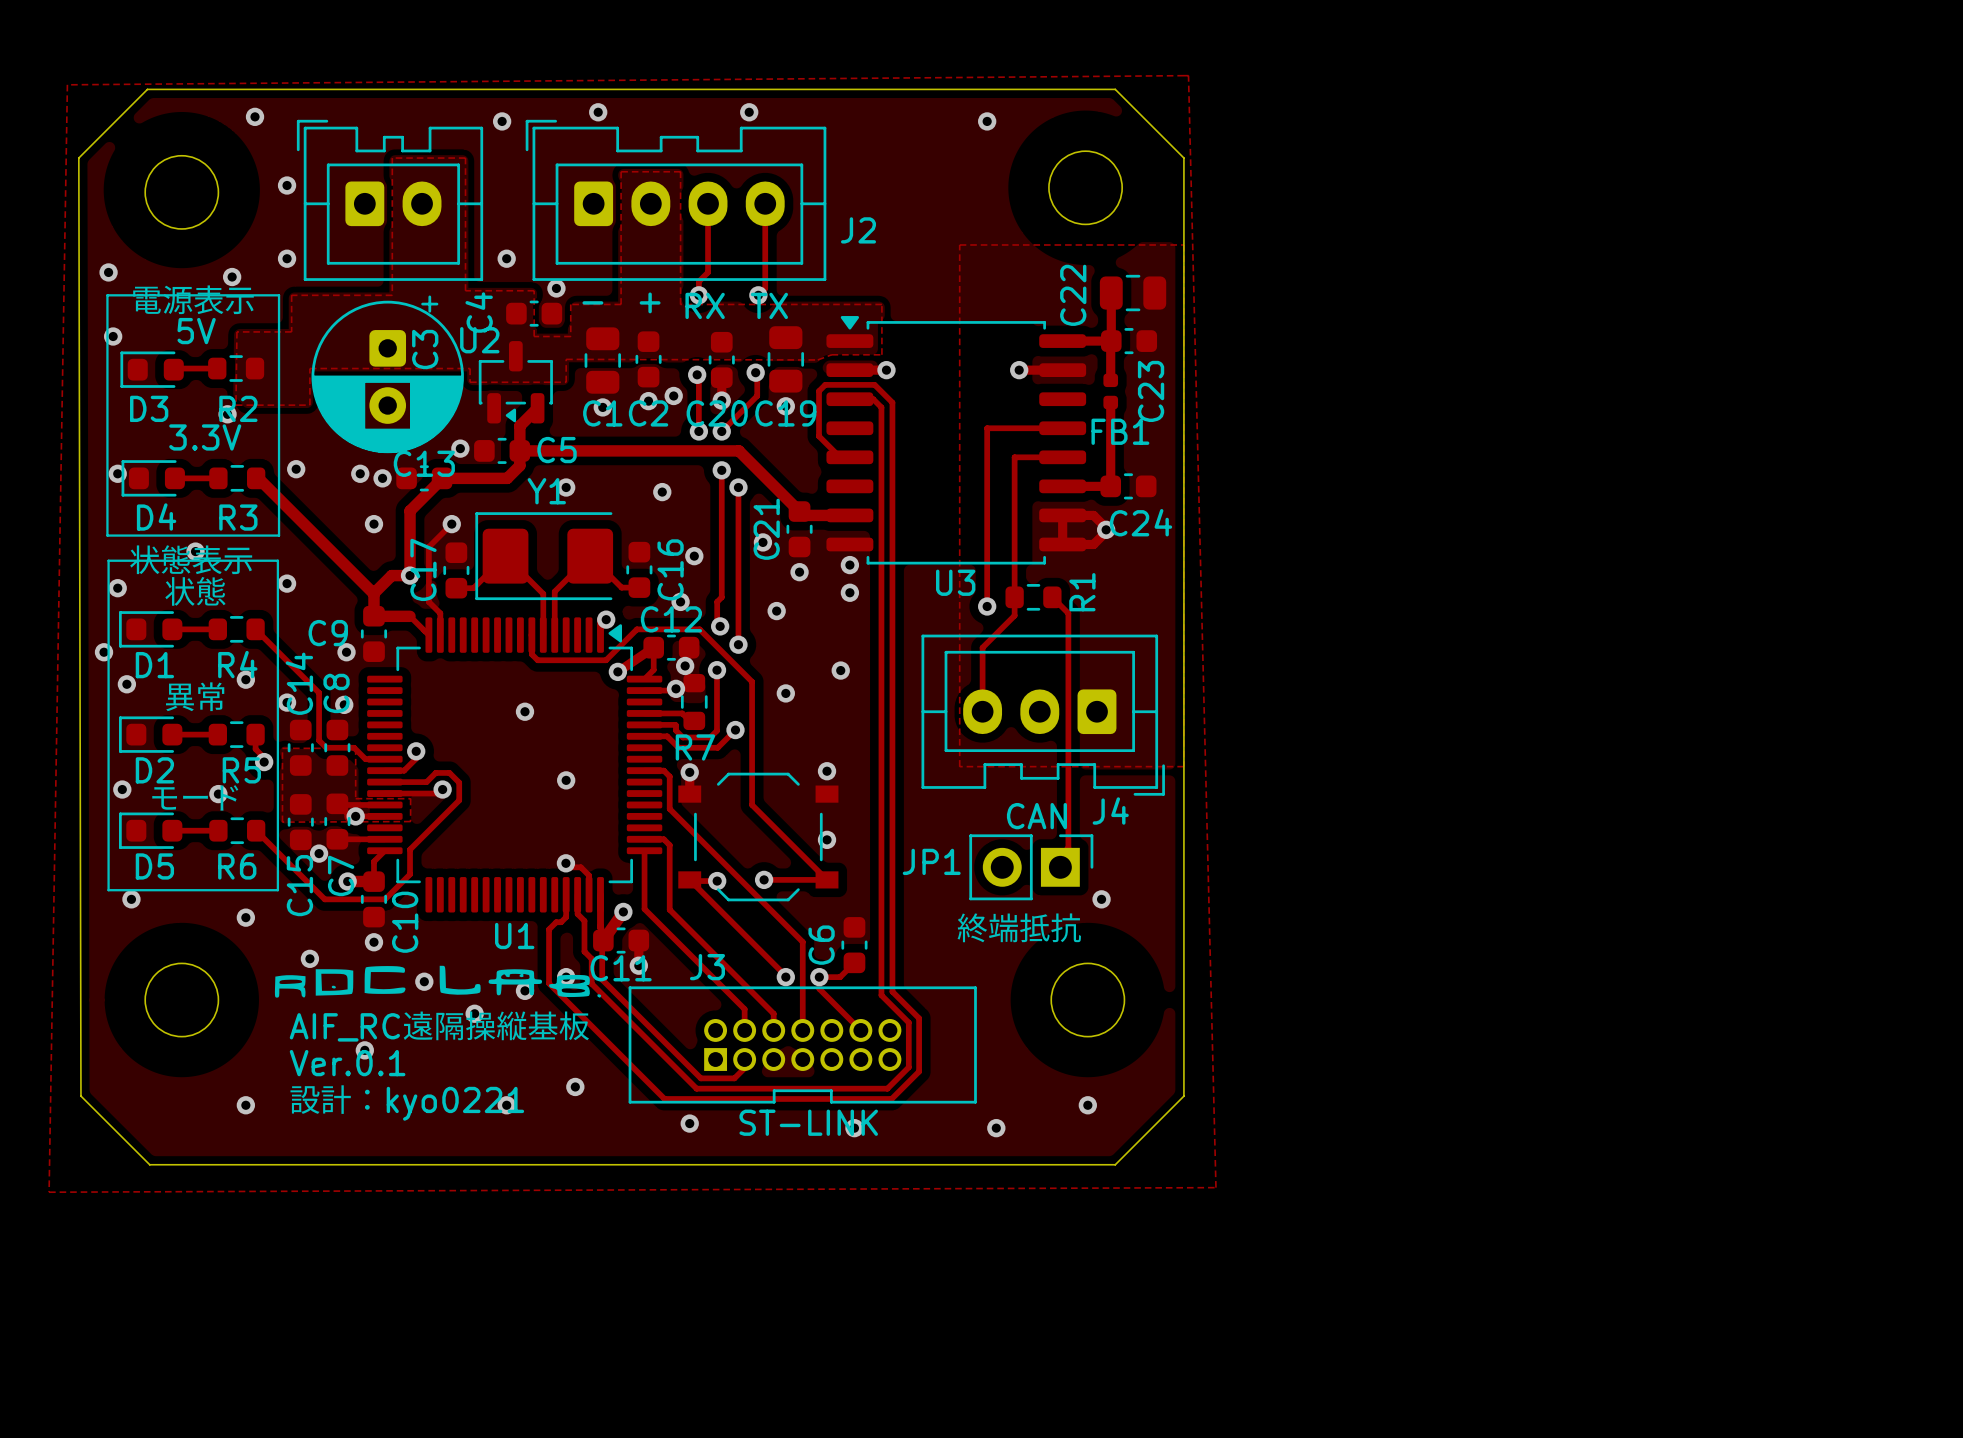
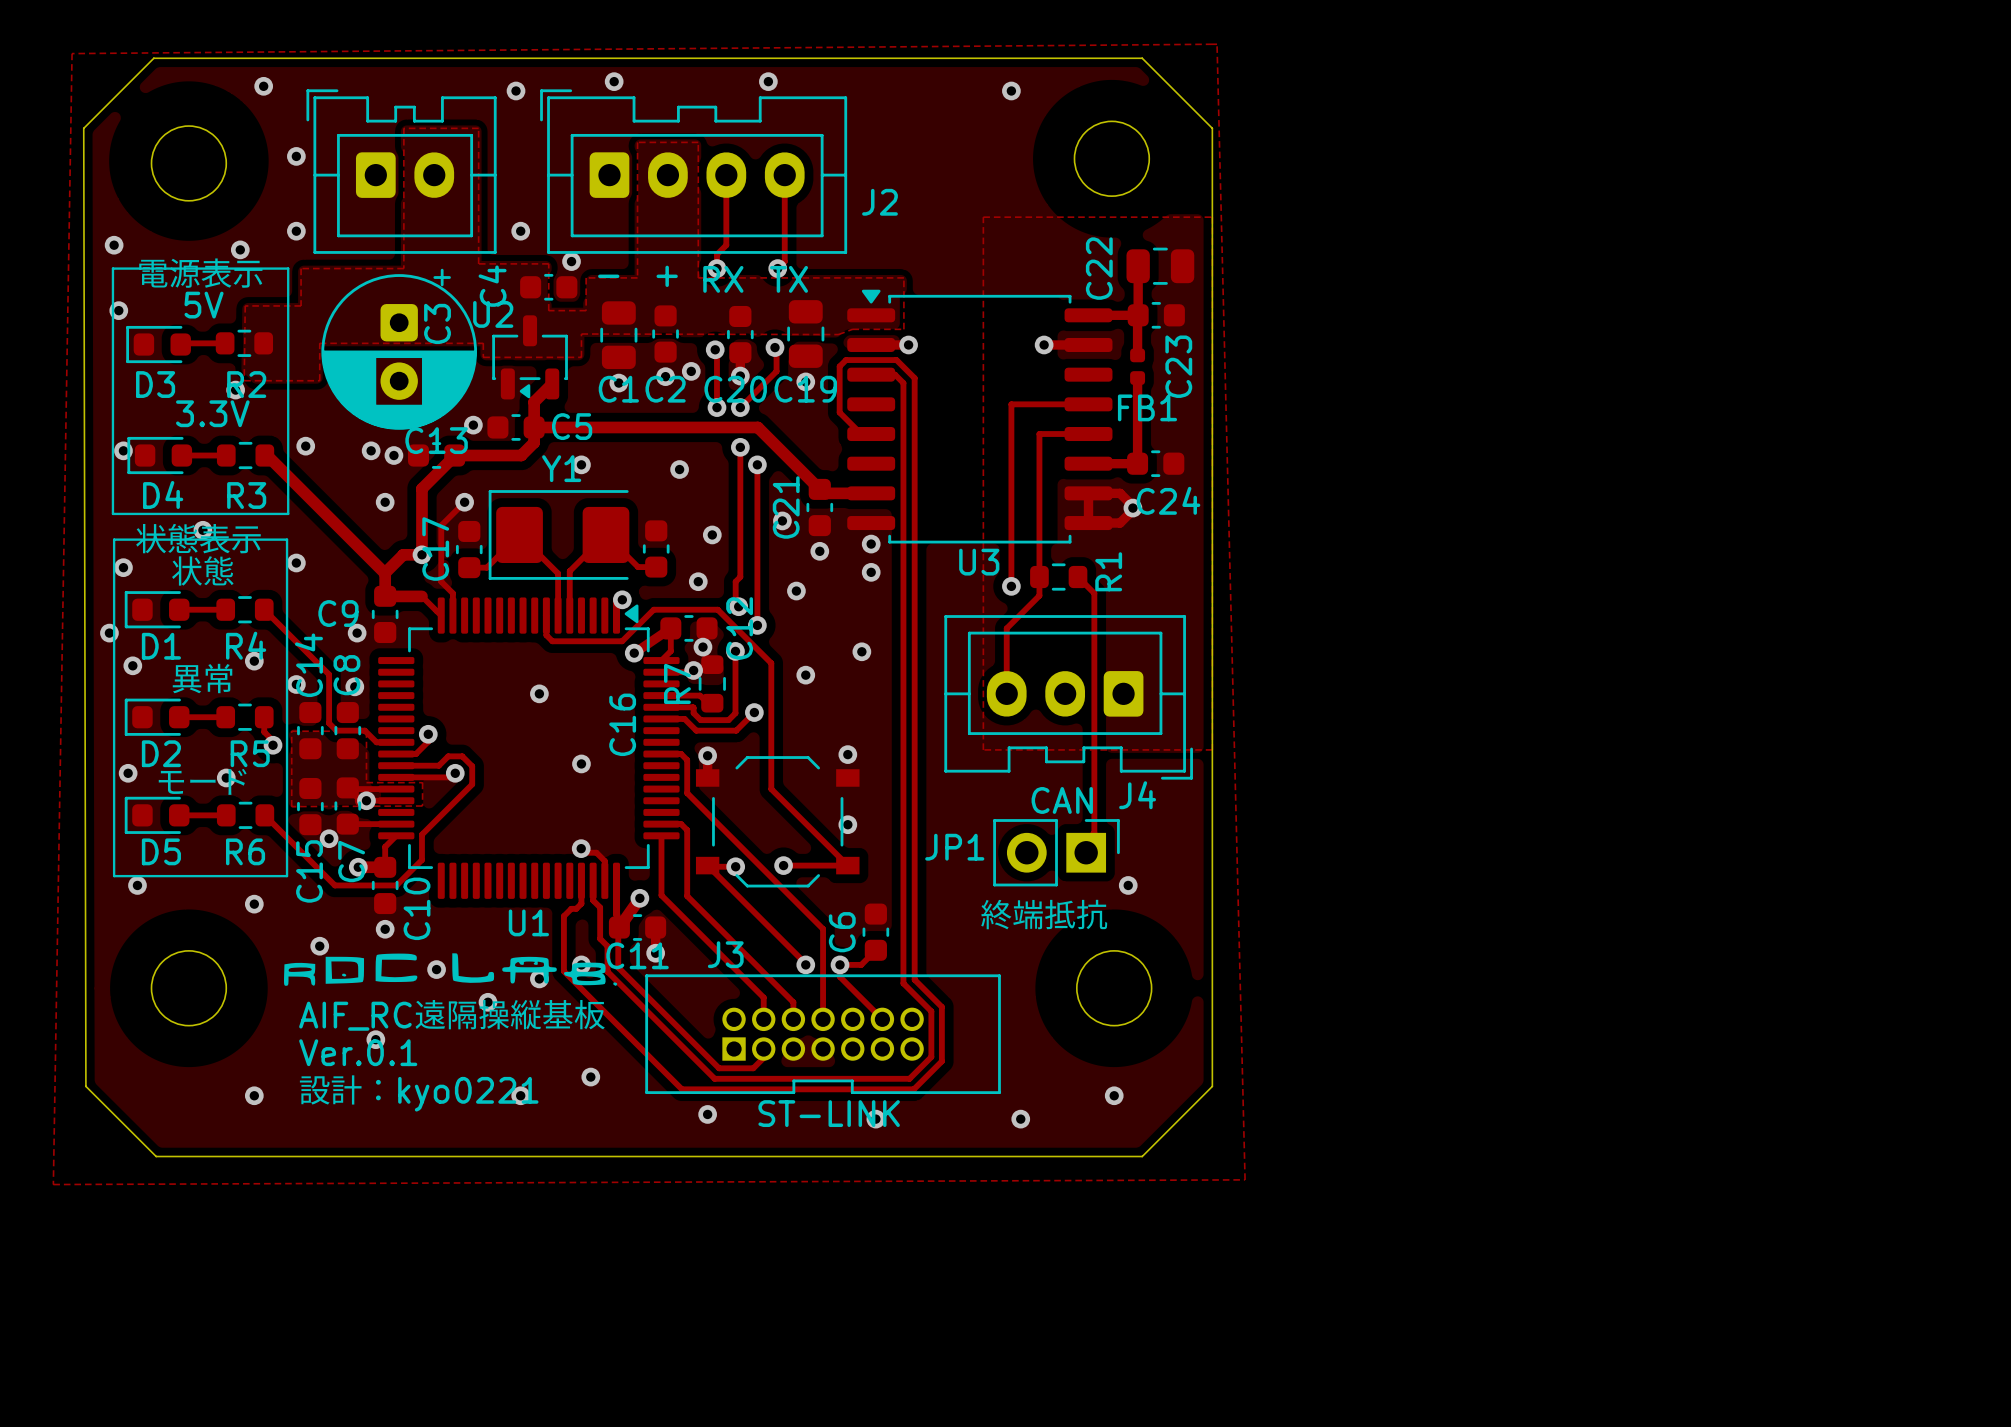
C16 name position: C16 (670, 569) -> C16 (622, 724)
C12 name rotation: 0° (671, 619) -> 90° counterclockwise (739, 628)
R7 name rotation: 0° (695, 747) -> 90° counterclockwise (677, 683)

